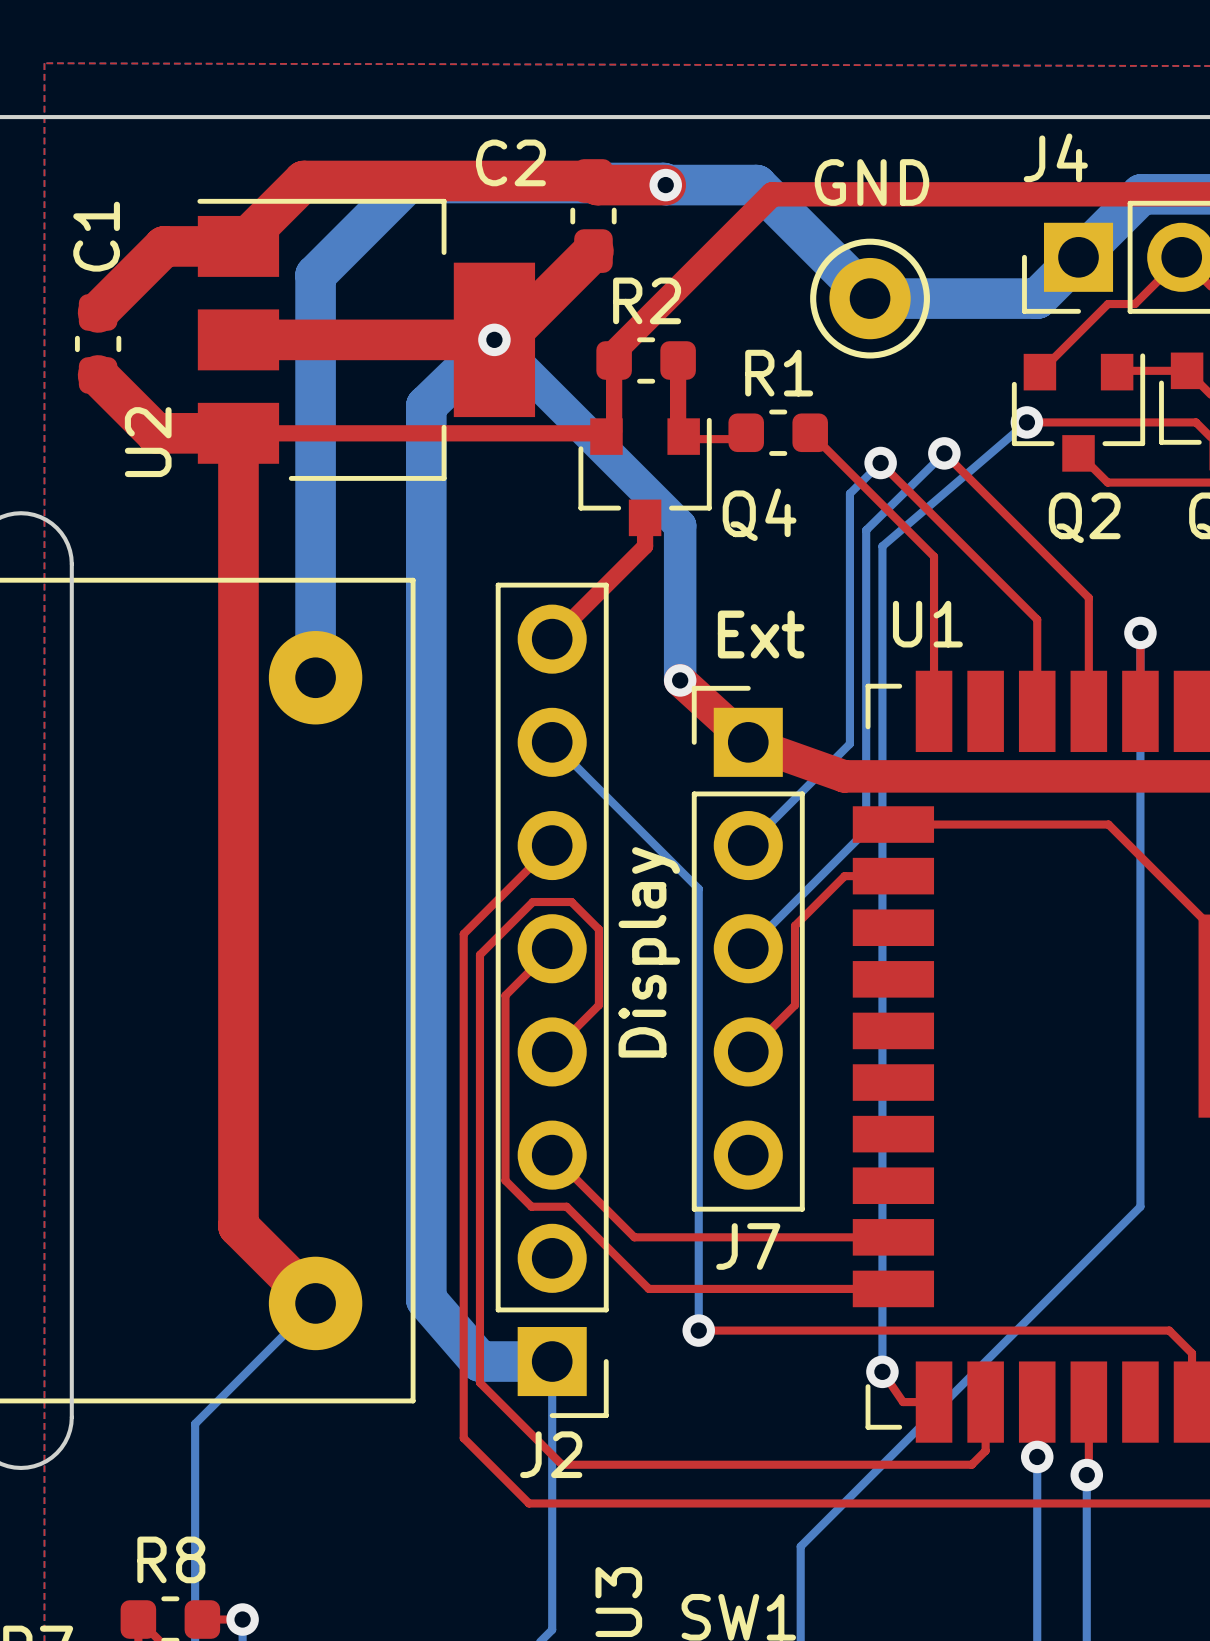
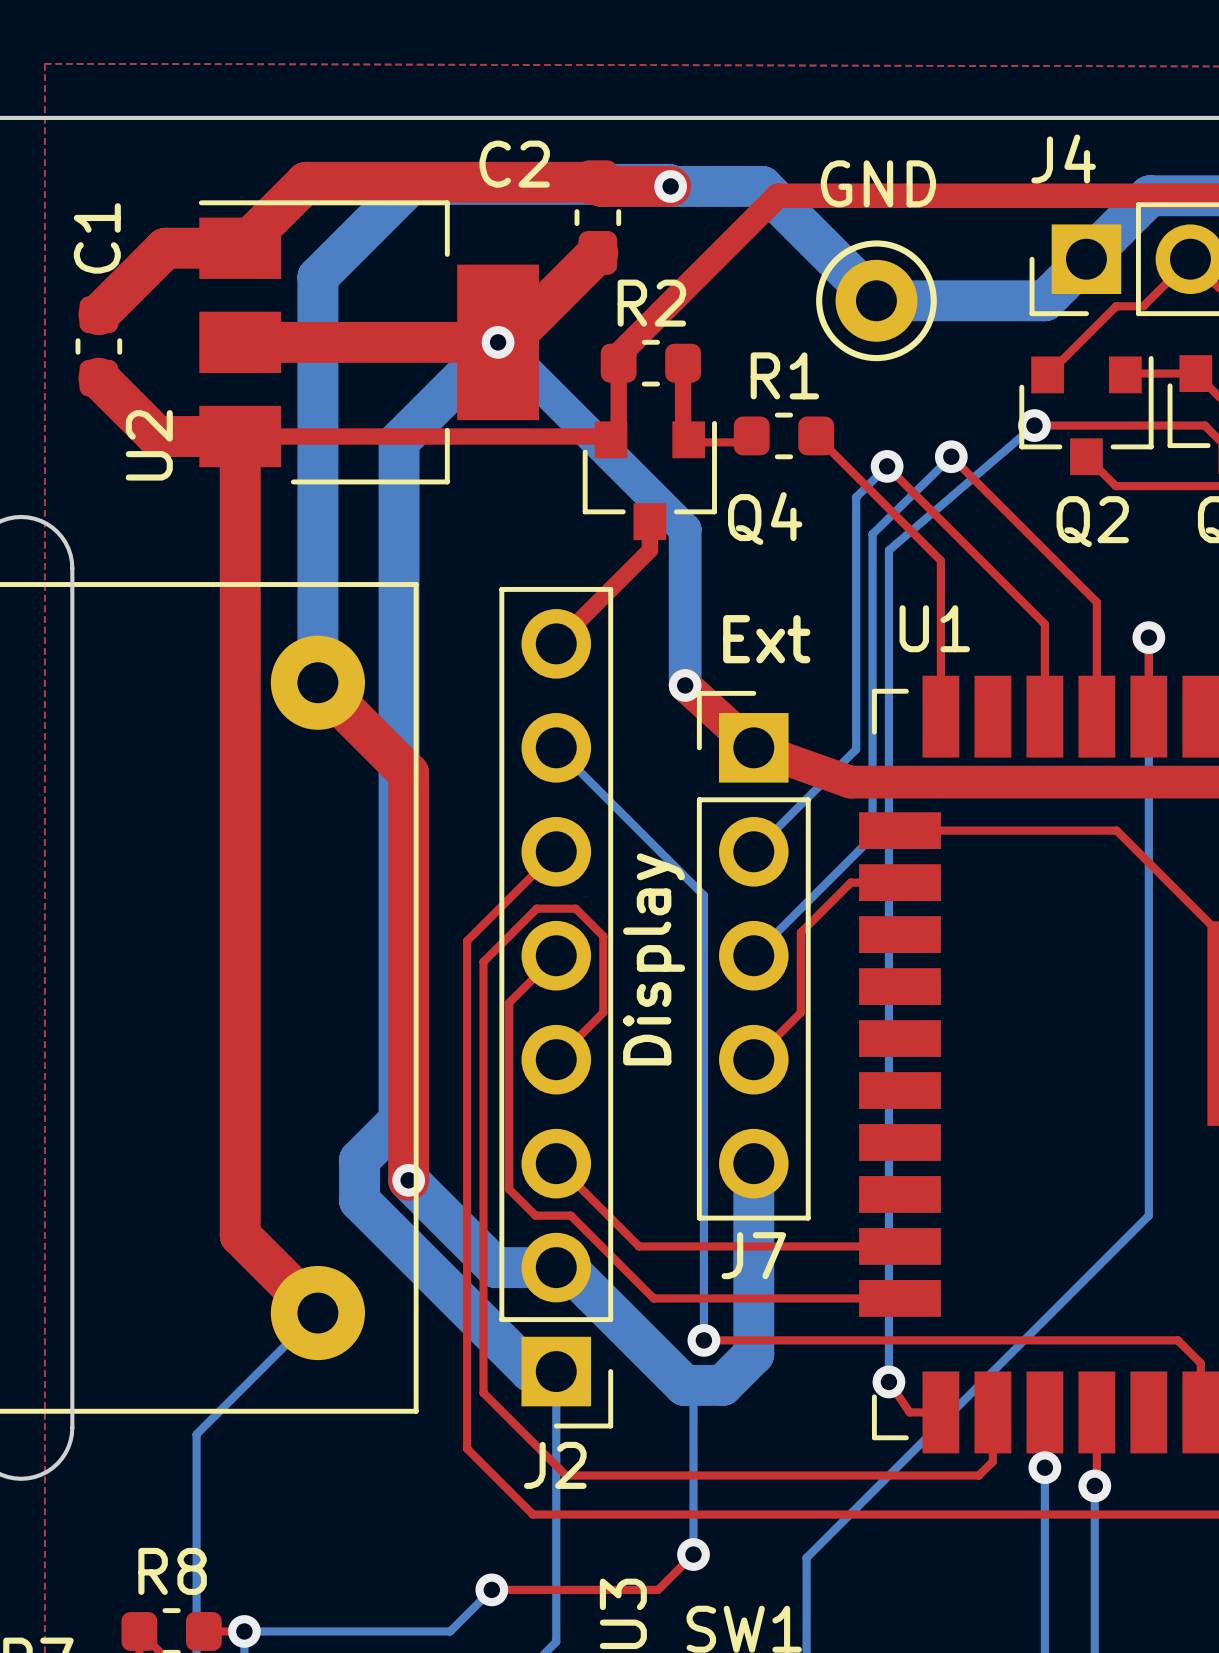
bottom track: (489, 345) (426, 405) (426, 1299) (479, 1361) (526, 1361) -> (492, 347) (399, 441) (399, 1120) (359, 1159) (359, 1200) (530, 1371)
top track: none -> (317, 682) (408, 773) (408, 1180)
bottom track: none -> (753, 1163) (753, 1354) (722, 1385) (684, 1385)
bottom track: none -> (408, 1180) (495, 1267) (566, 1267) (684, 1385)
via: none -> (408, 1180)
bottom track: none -> (684, 1385) (693, 1394) (693, 1554)
top track: none -> (693, 1554) (658, 1589) (491, 1589)
via: none -> (693, 1554)
bottom track: none -> (491, 1589) (450, 1631) (244, 1631)
via: none -> (491, 1589)

